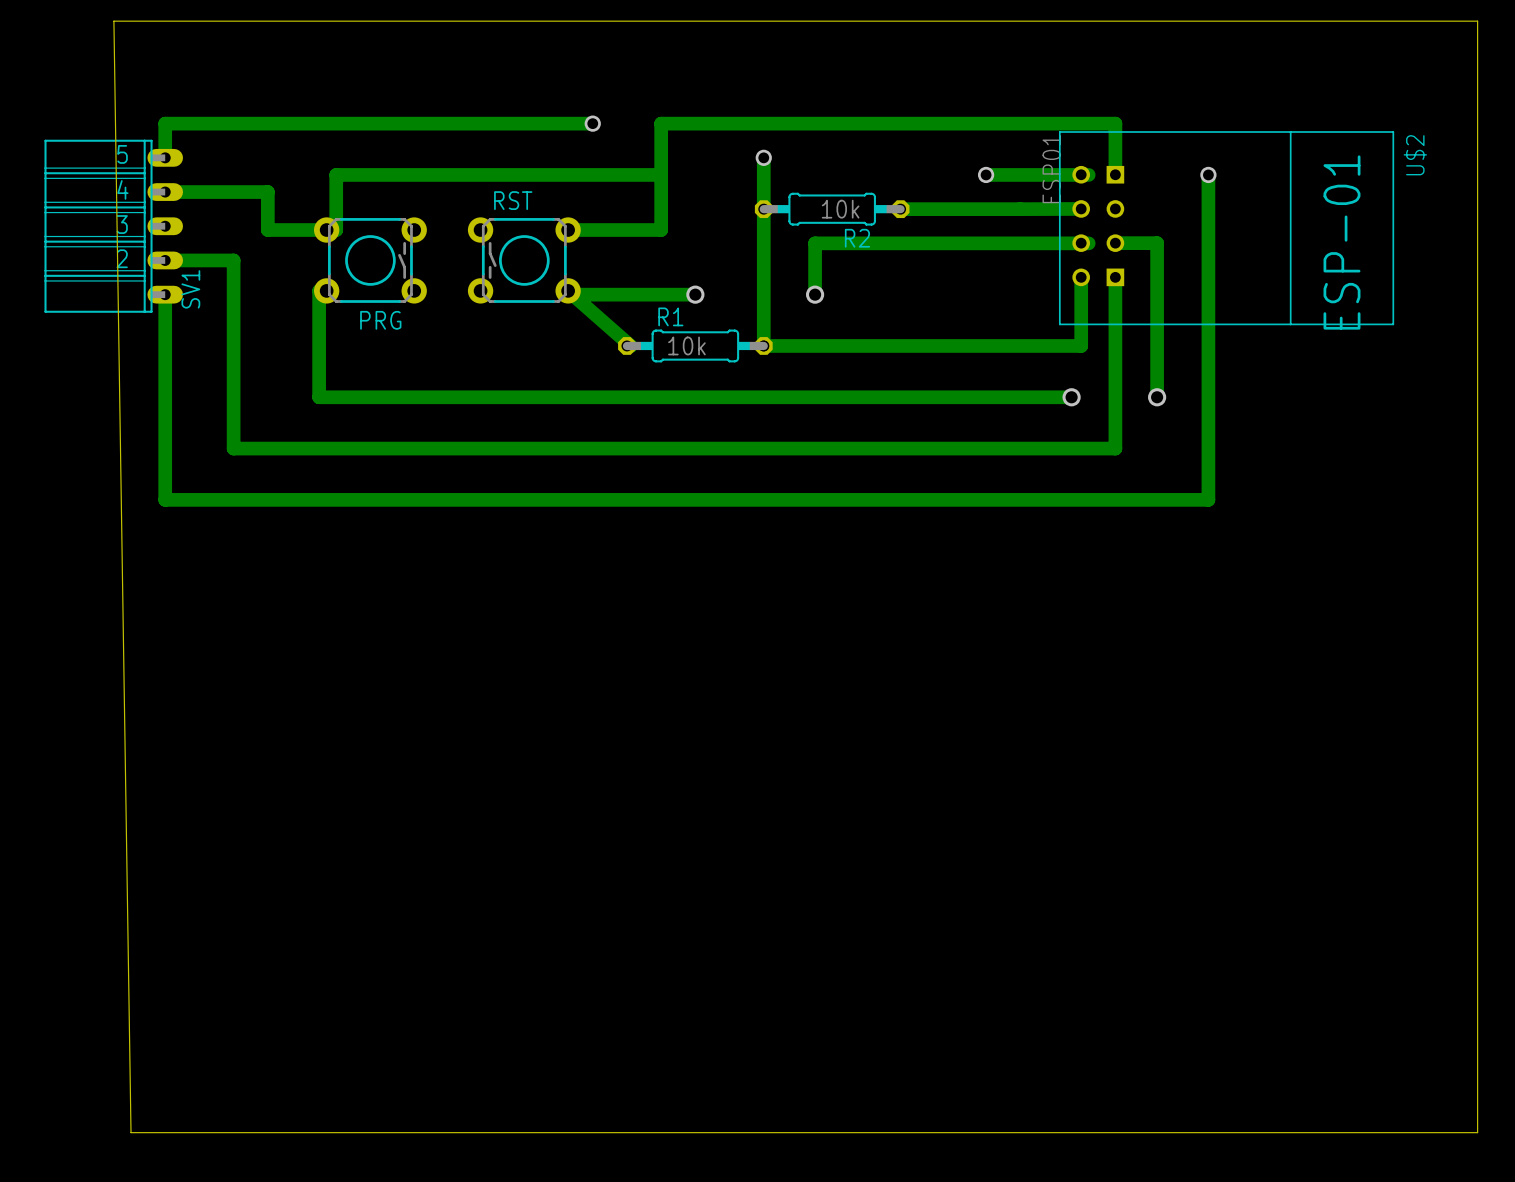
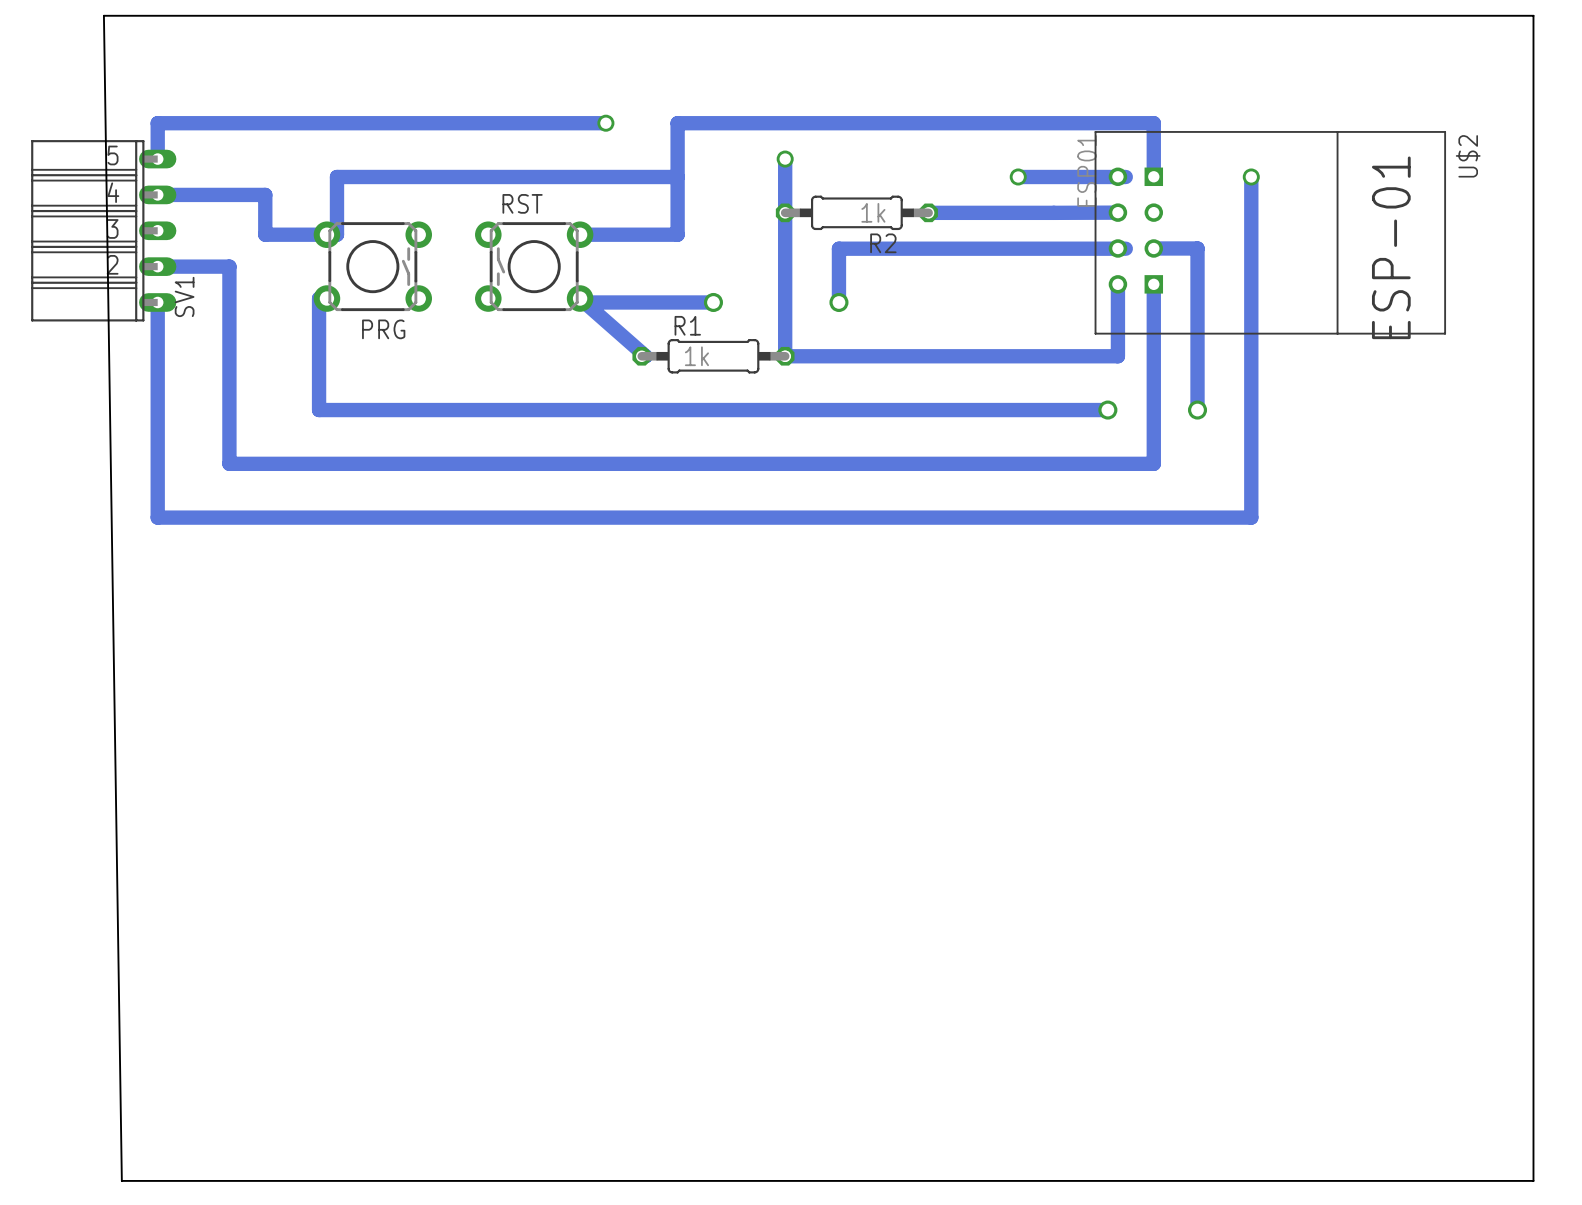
R2 value: 10k (840, 209) -> 1k (873, 212)
R1 value: 10k (686, 345) -> 1k (696, 356)

